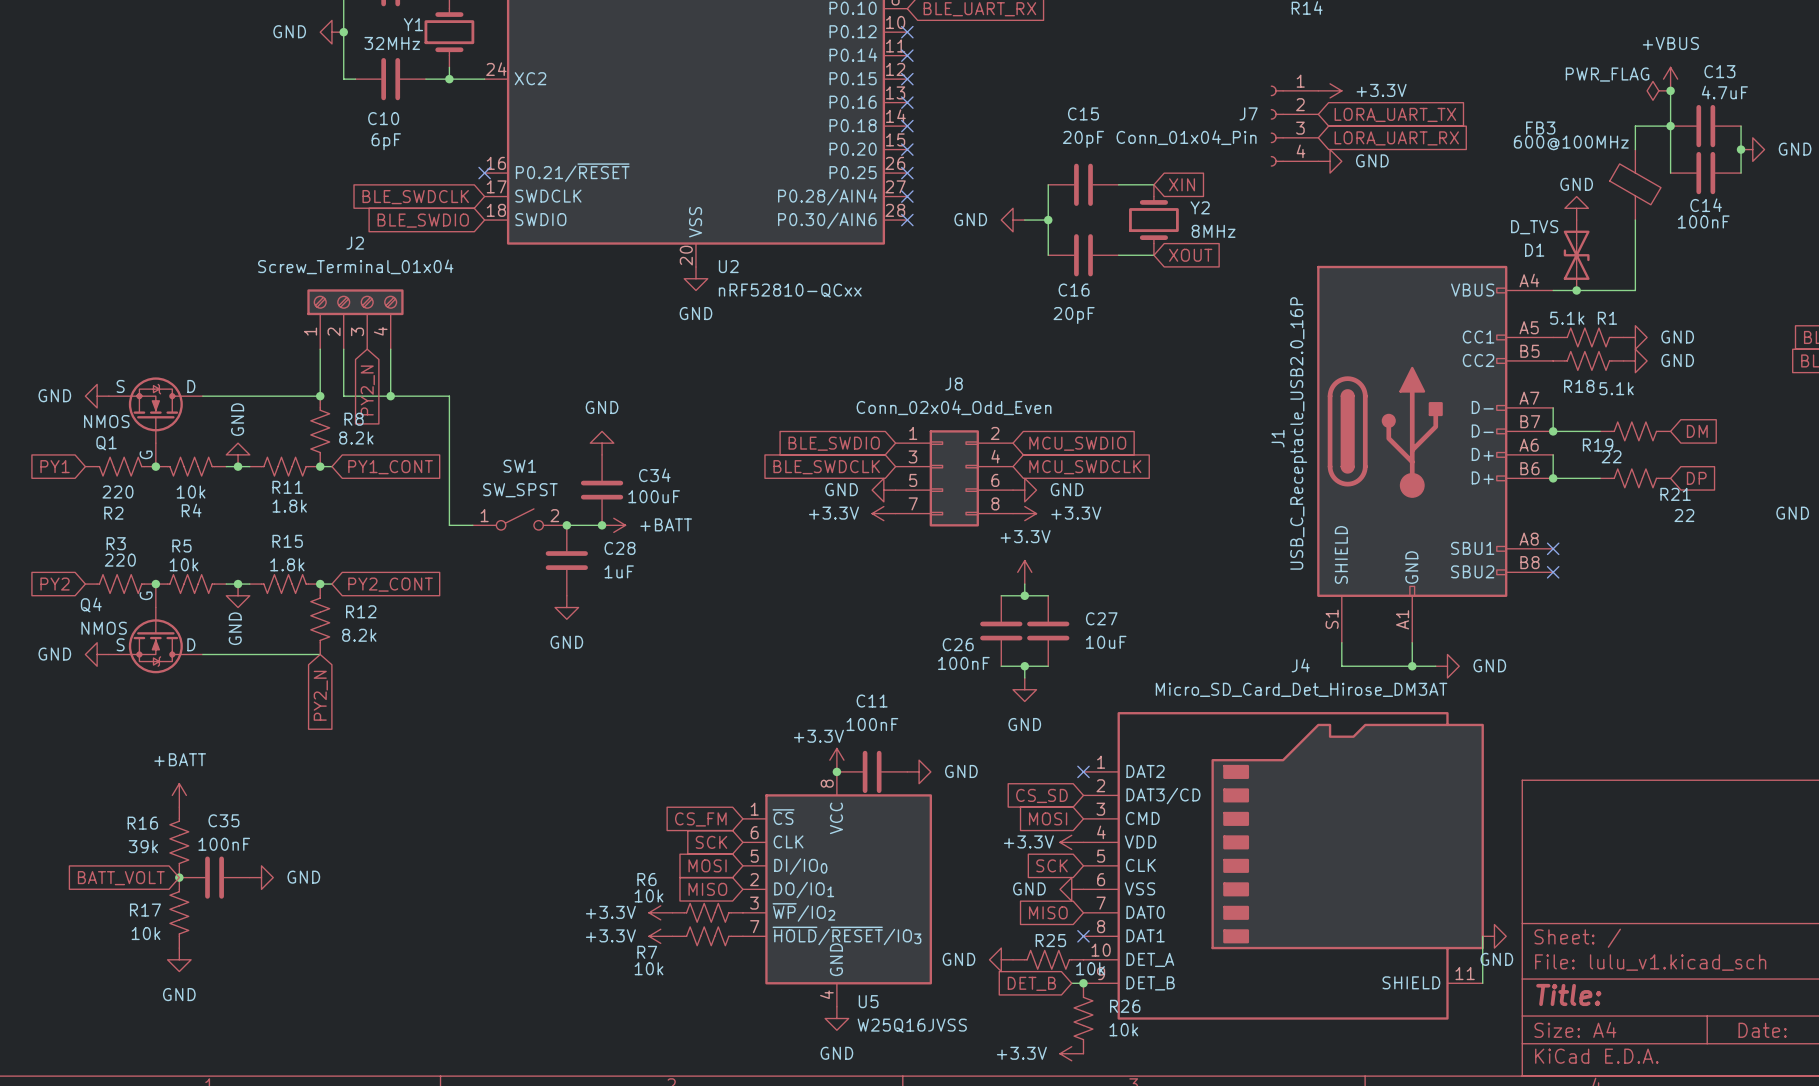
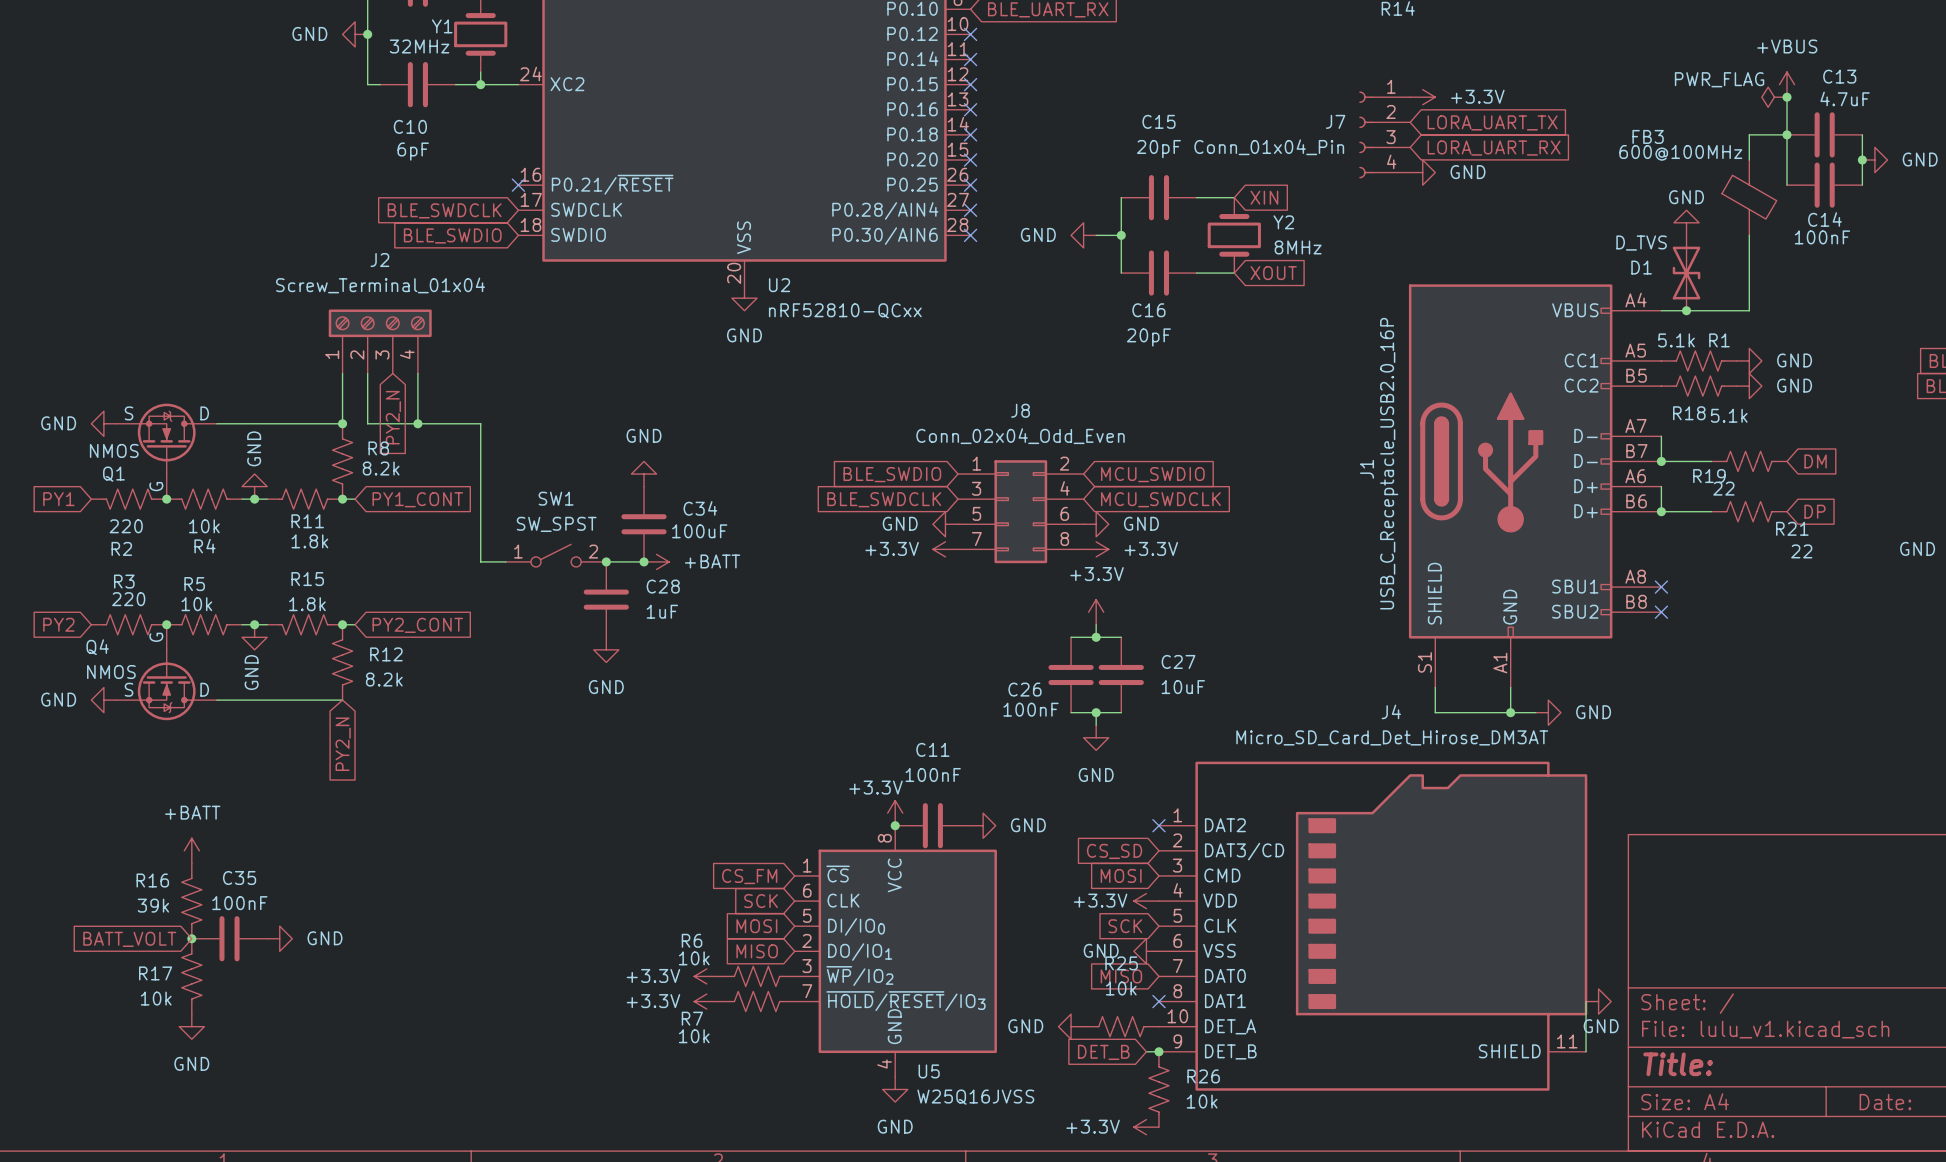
R25 name position: R25 (1050, 940) -> R25 (1121, 963)
R25 value position: 10k (1090, 968) -> 10k (1121, 988)

